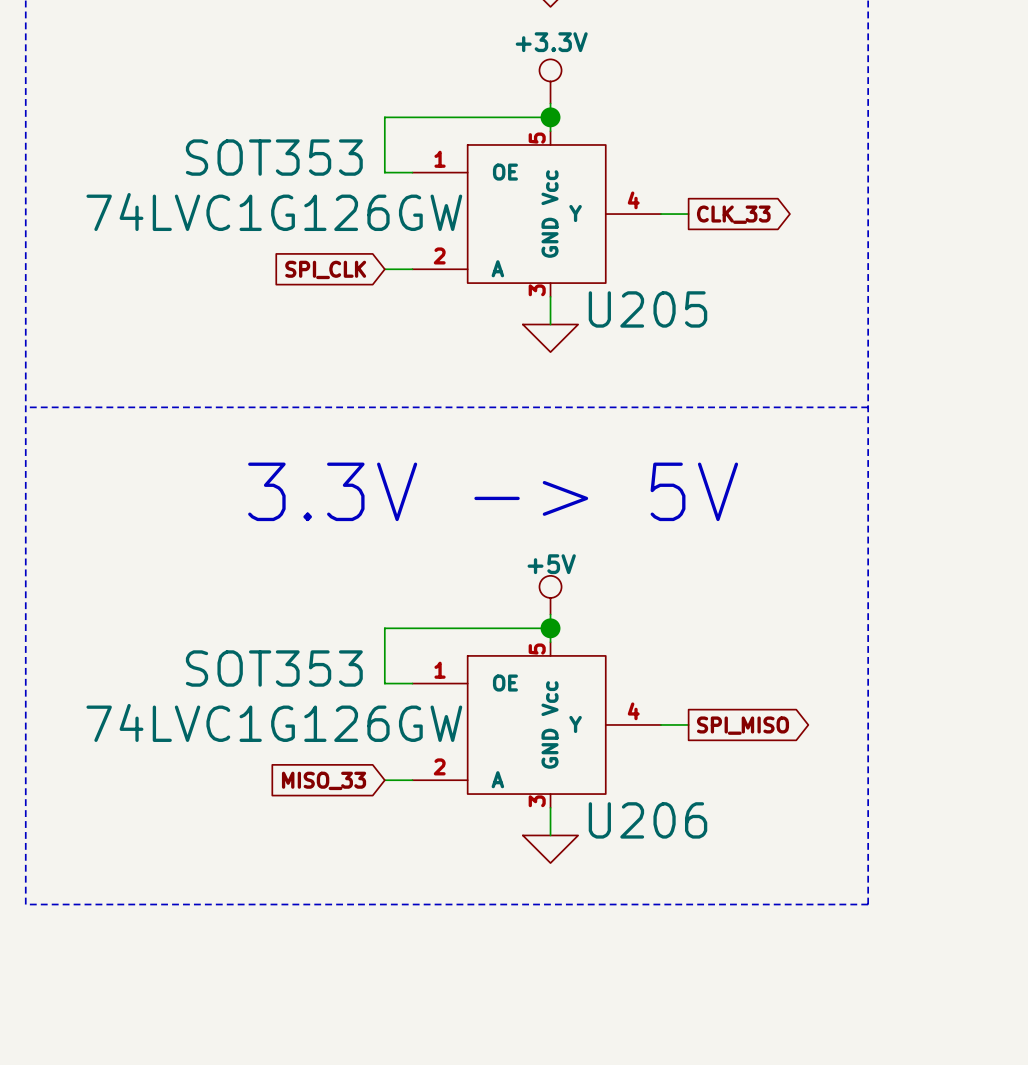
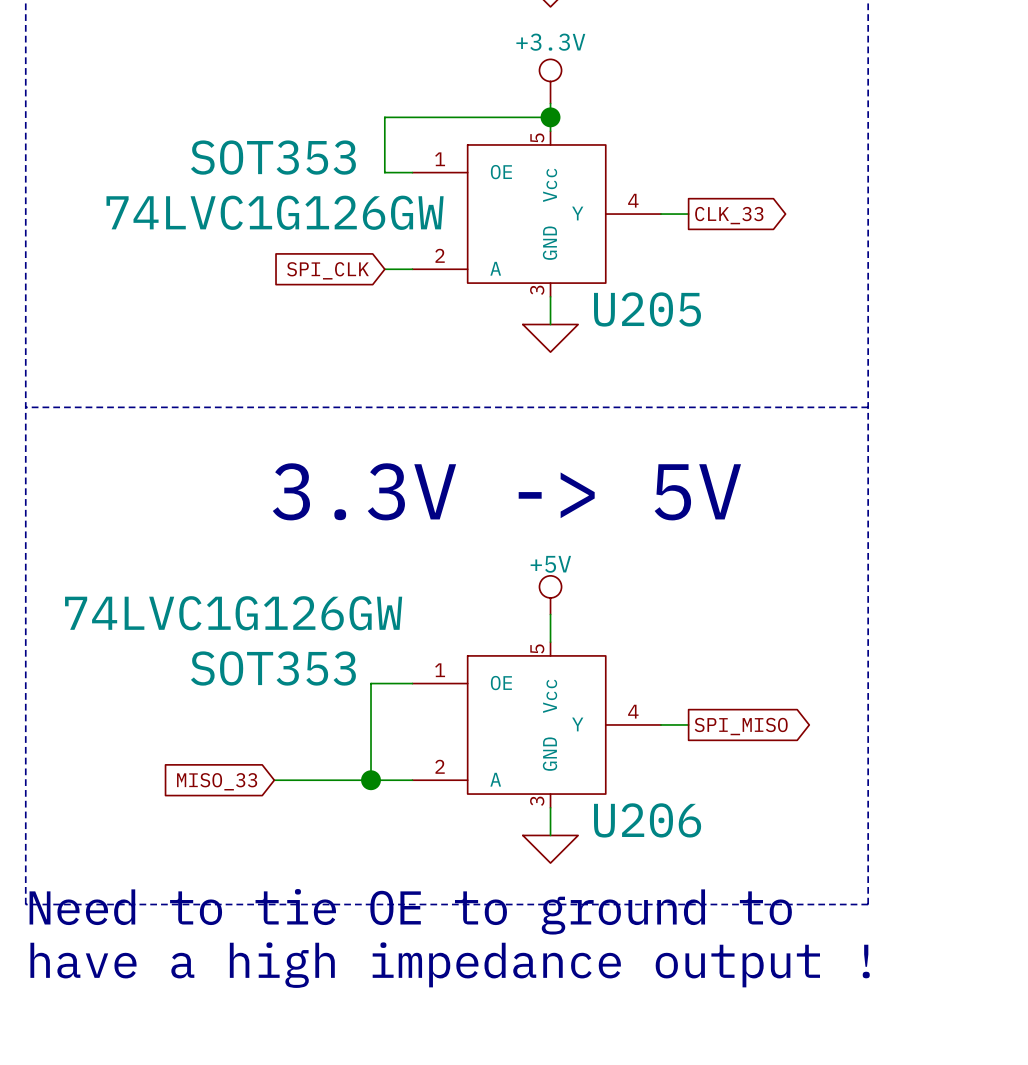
wire: (550, 628) (384, 628) (384, 683) -> (371, 780) (371, 683) (384, 683)
junction: (550, 628) -> none
U206 value position: 74LVC1G126GW (274, 722) -> 74LVC1G126GW (233, 613)
wire: none -> (274, 780) (384, 780)
global label position: MISO_33 (324, 780) -> MISO_33 (217, 781)
junction: none -> (371, 780)
text: none -> Need to tie OE to ground to (410, 911)
text: none -> have a high impedance output ! (450, 965)

